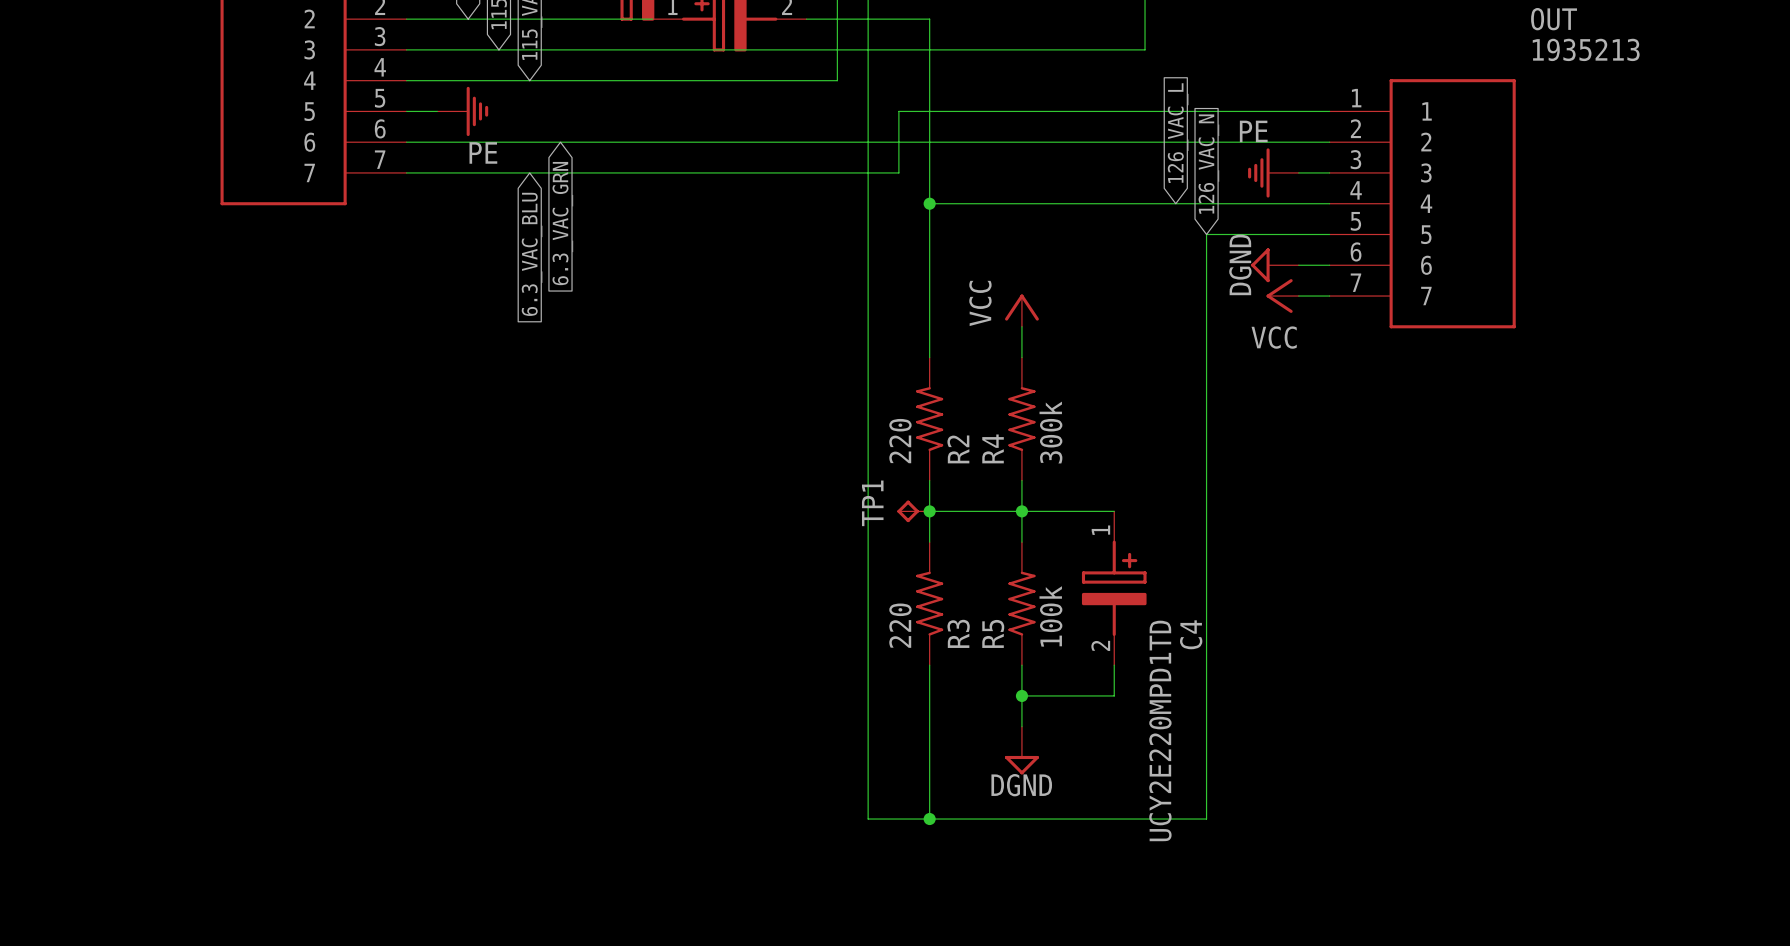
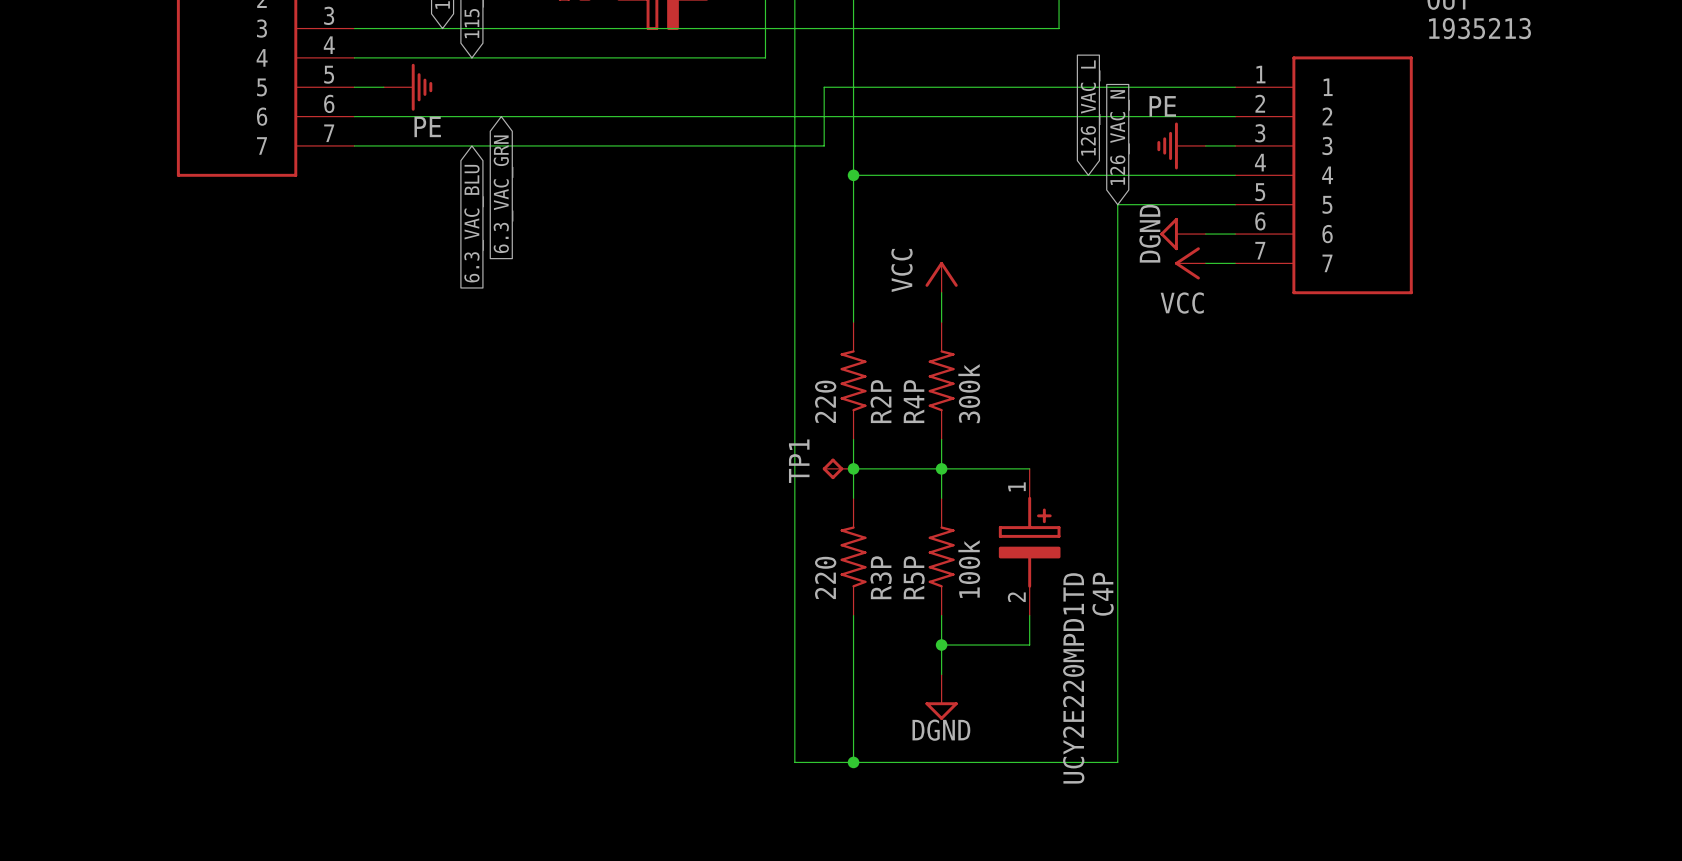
R4 name: R4 (993, 448) -> R4P (914, 401)
R2 name: R2 (958, 449) -> R2P (880, 401)
R3 name: R3 (958, 633) -> R3P (881, 577)
R5 name: R5 (993, 633) -> R5P (914, 577)
C4 name: C4 (1191, 634) -> C4P (1103, 594)

